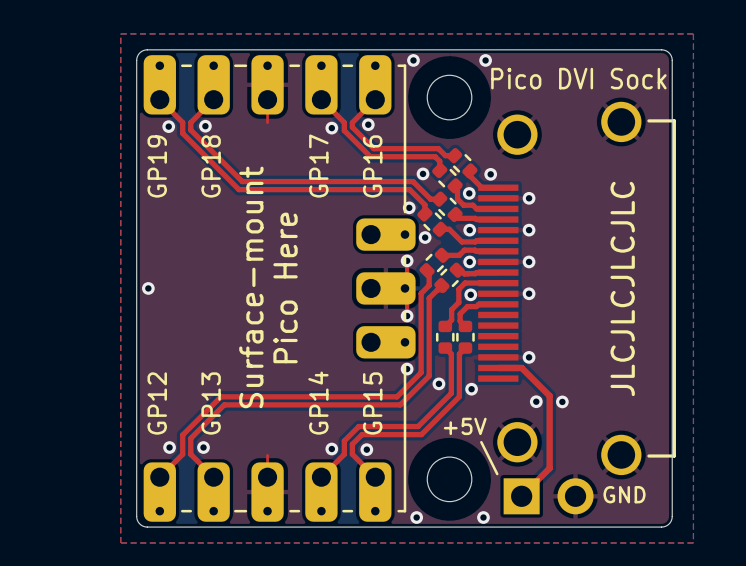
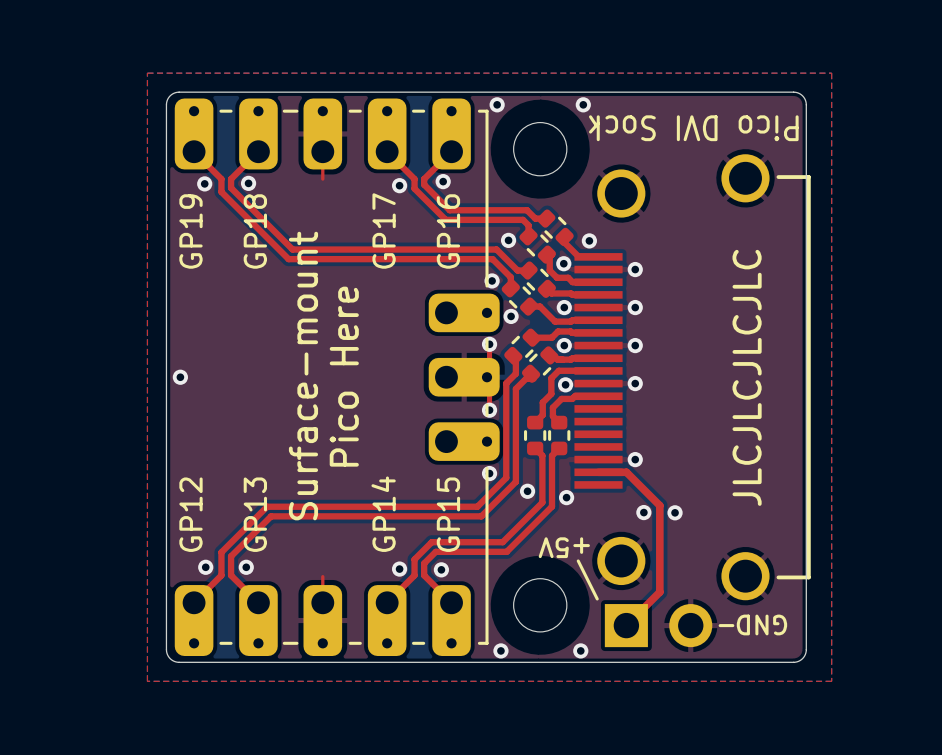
text rotation: 0° (578, 78) -> 180° (693, 128)
text rotation: 0° (465, 426) -> 180° (564, 547)
text rotation: 0° (624, 494) -> 180° (761, 624)
line: none -> (720, 625) (732, 625)

